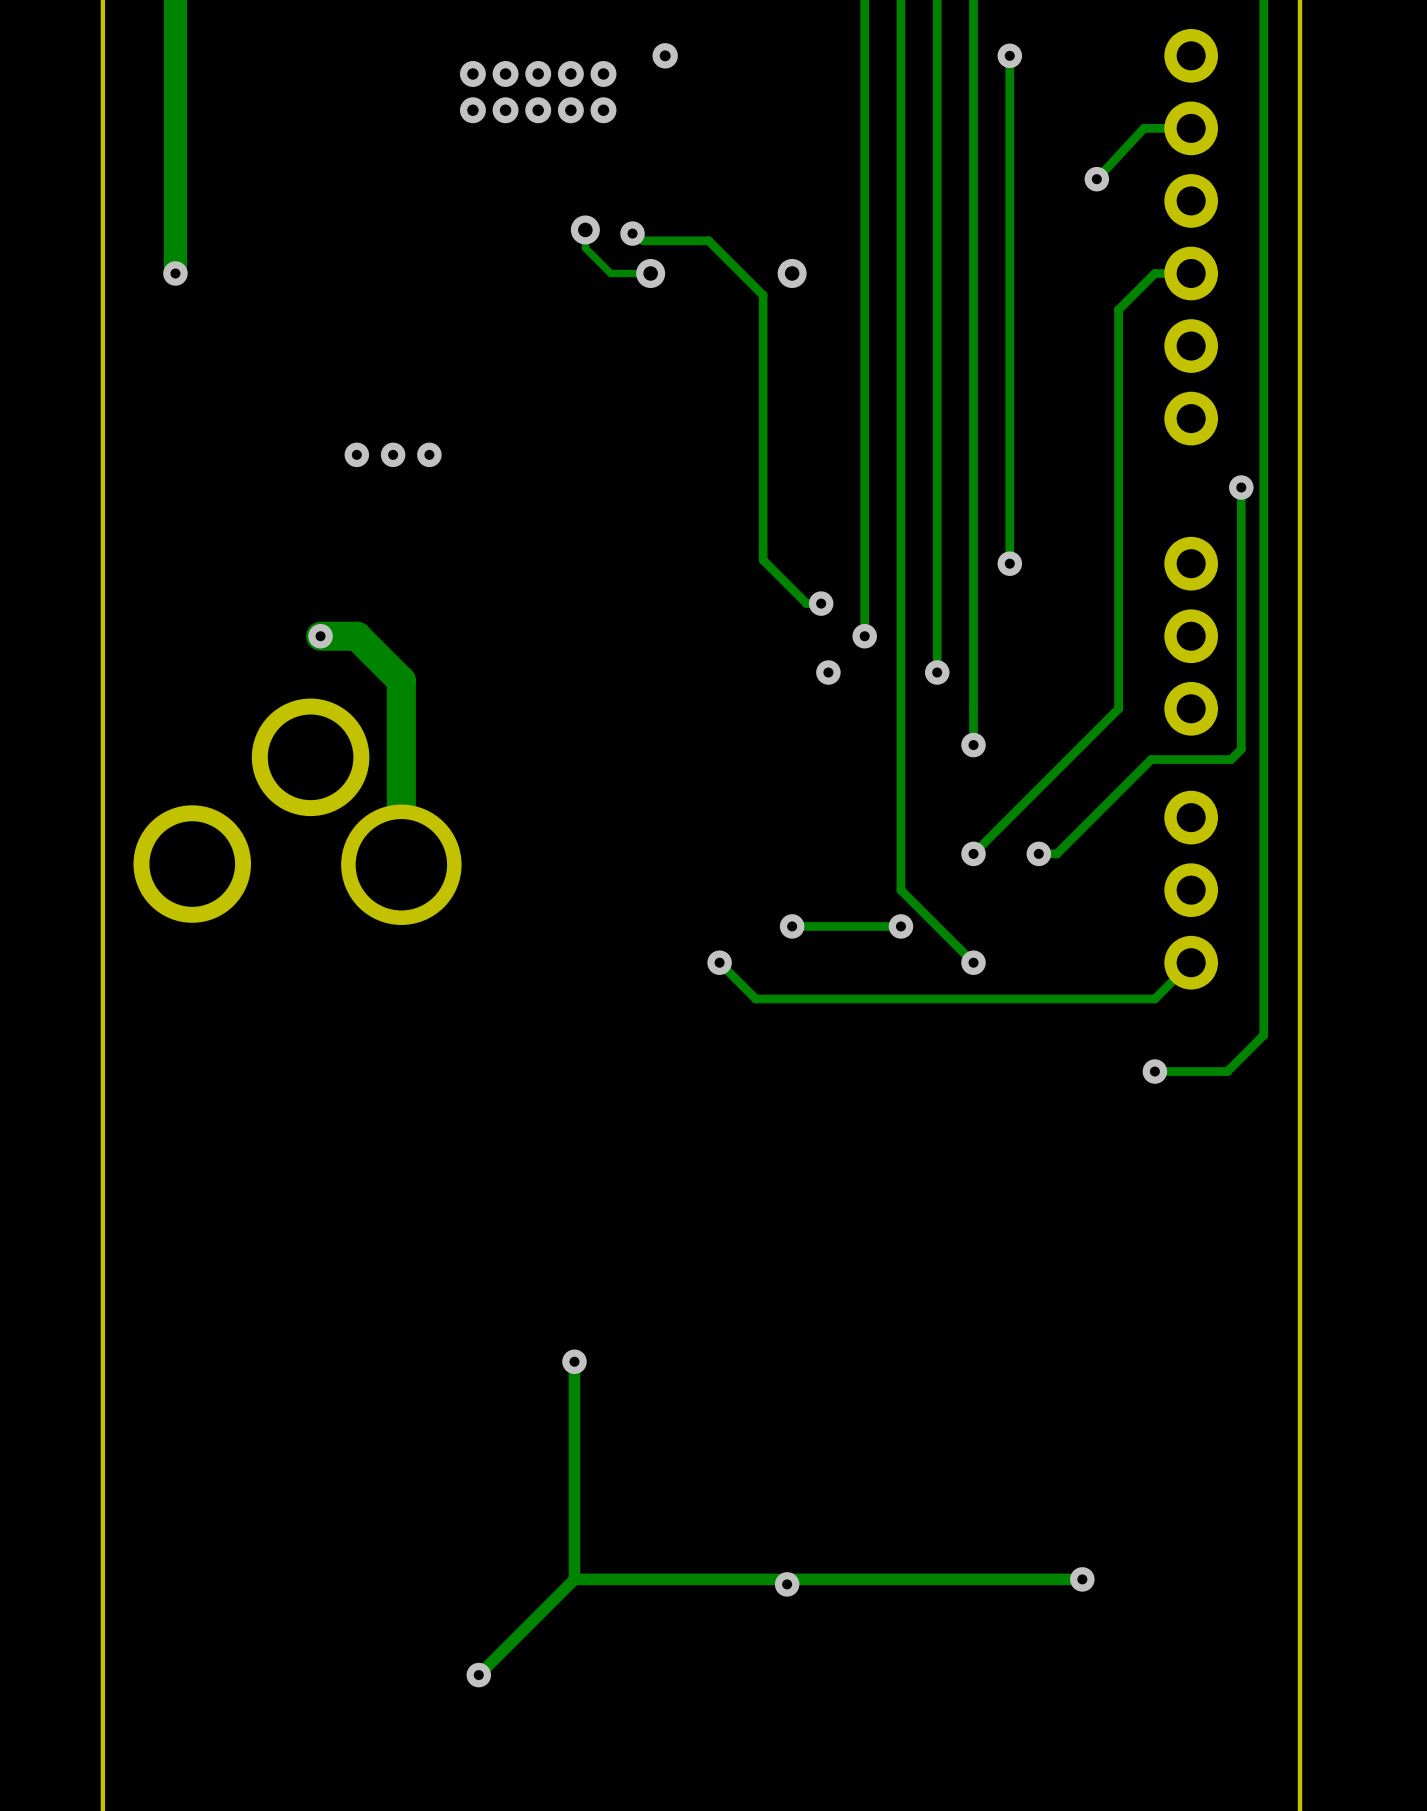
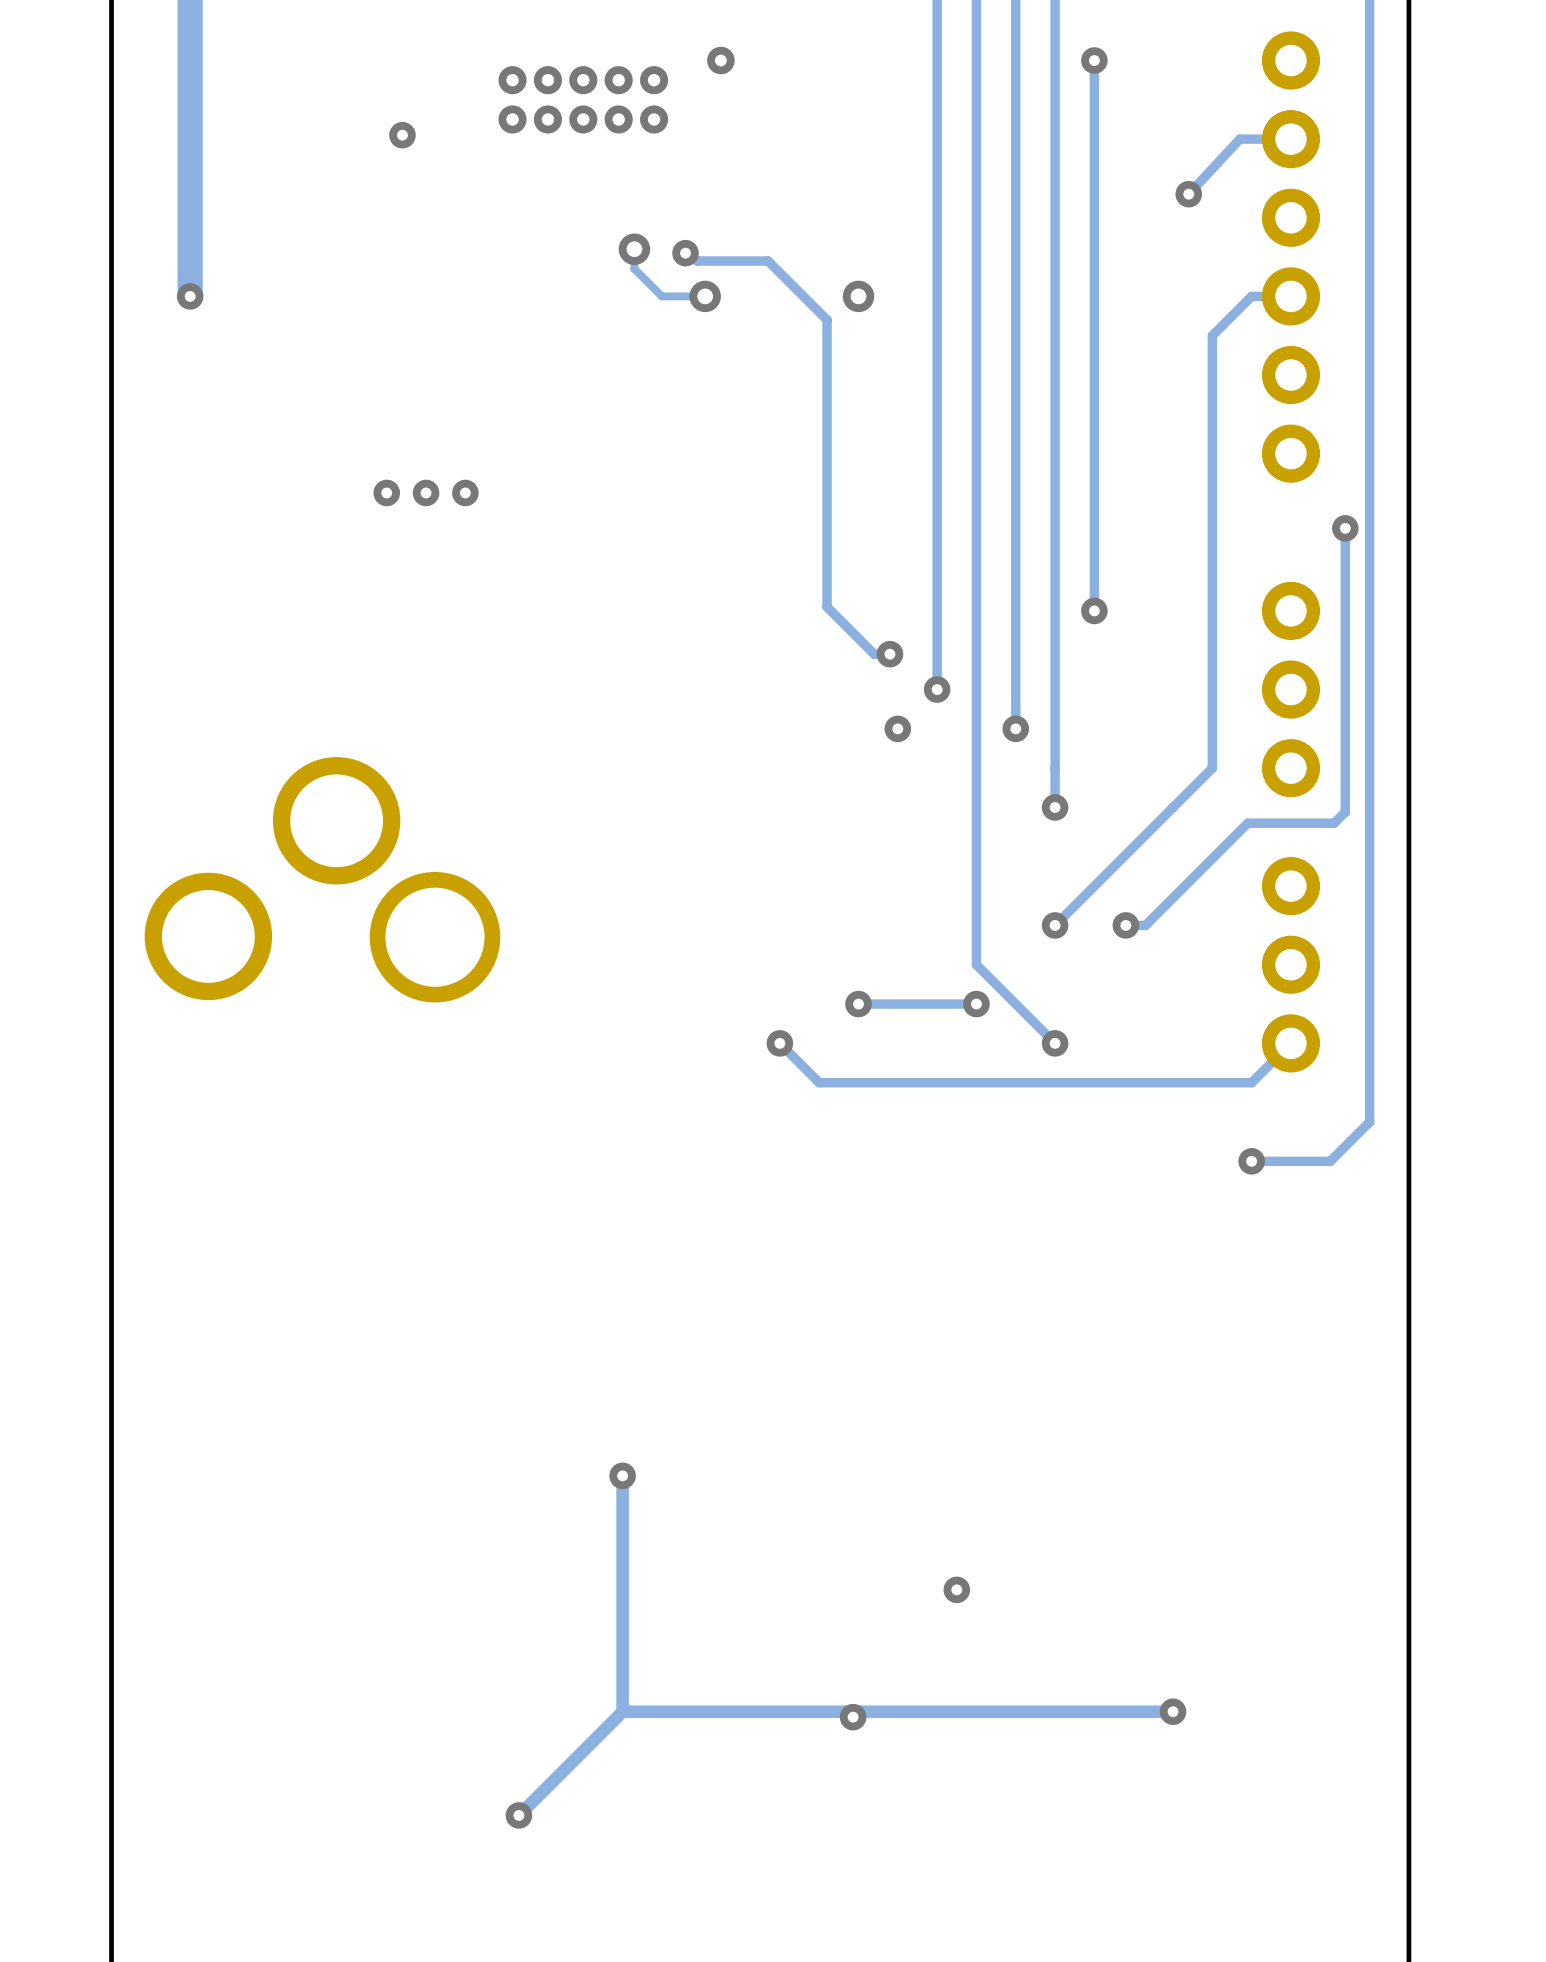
via: none -> (402, 135)
track: (320, 636) (356, 636) (401, 680) (401, 864) -> none
via: (320, 636) -> none
via: none -> (956, 1589)

